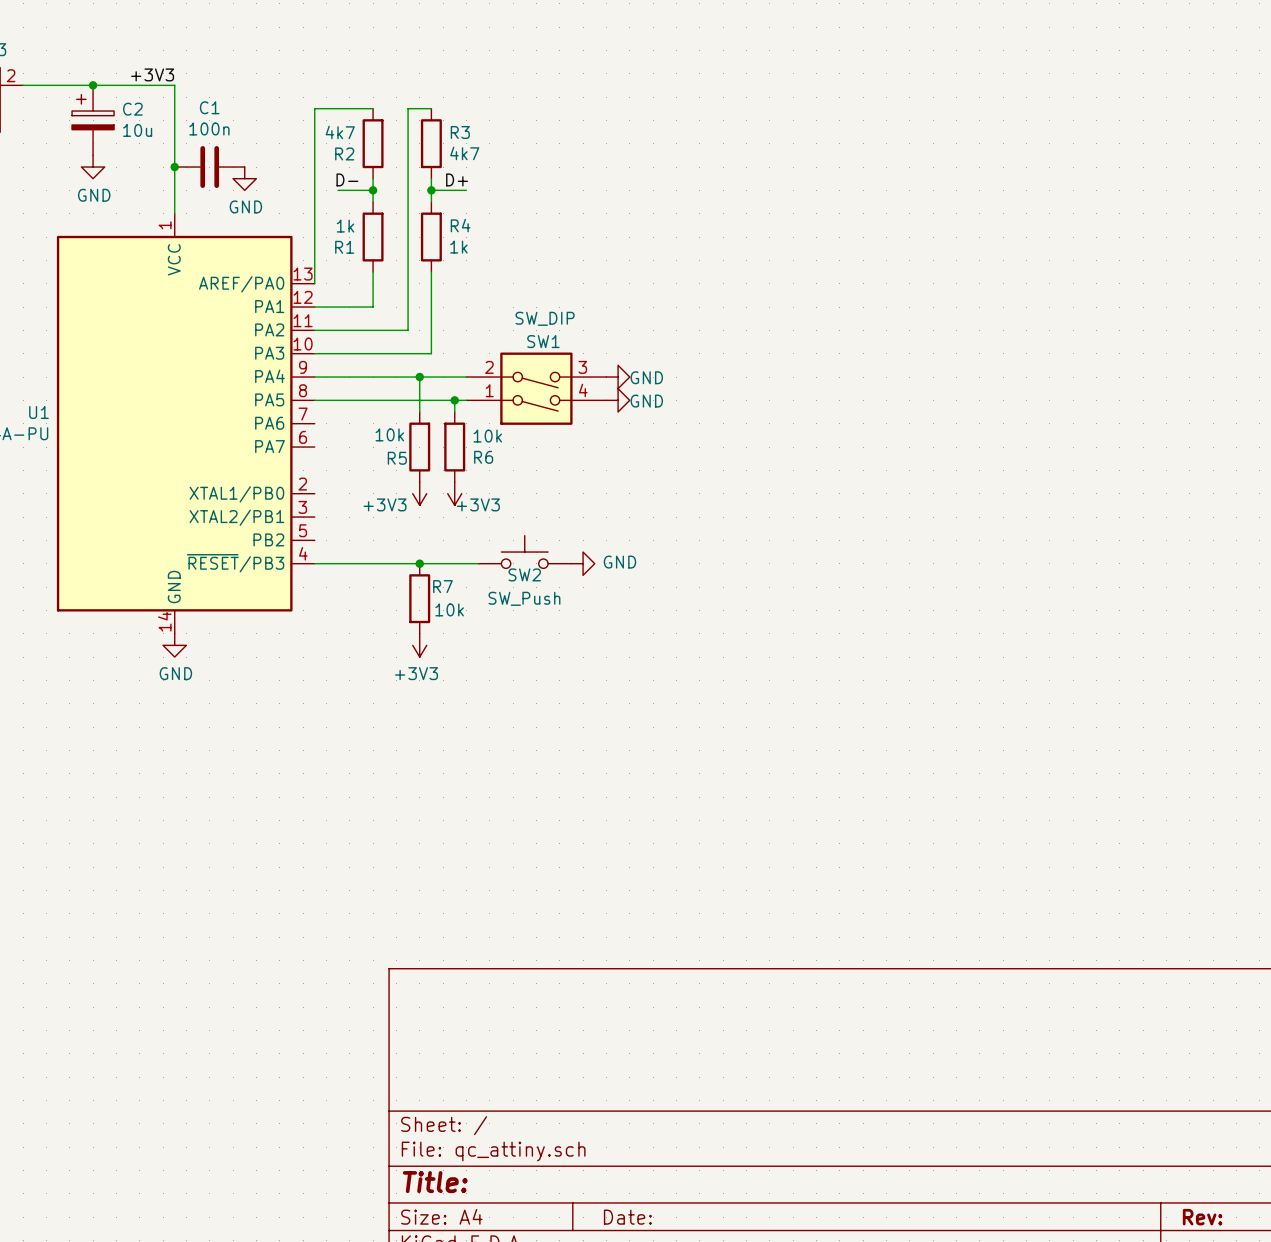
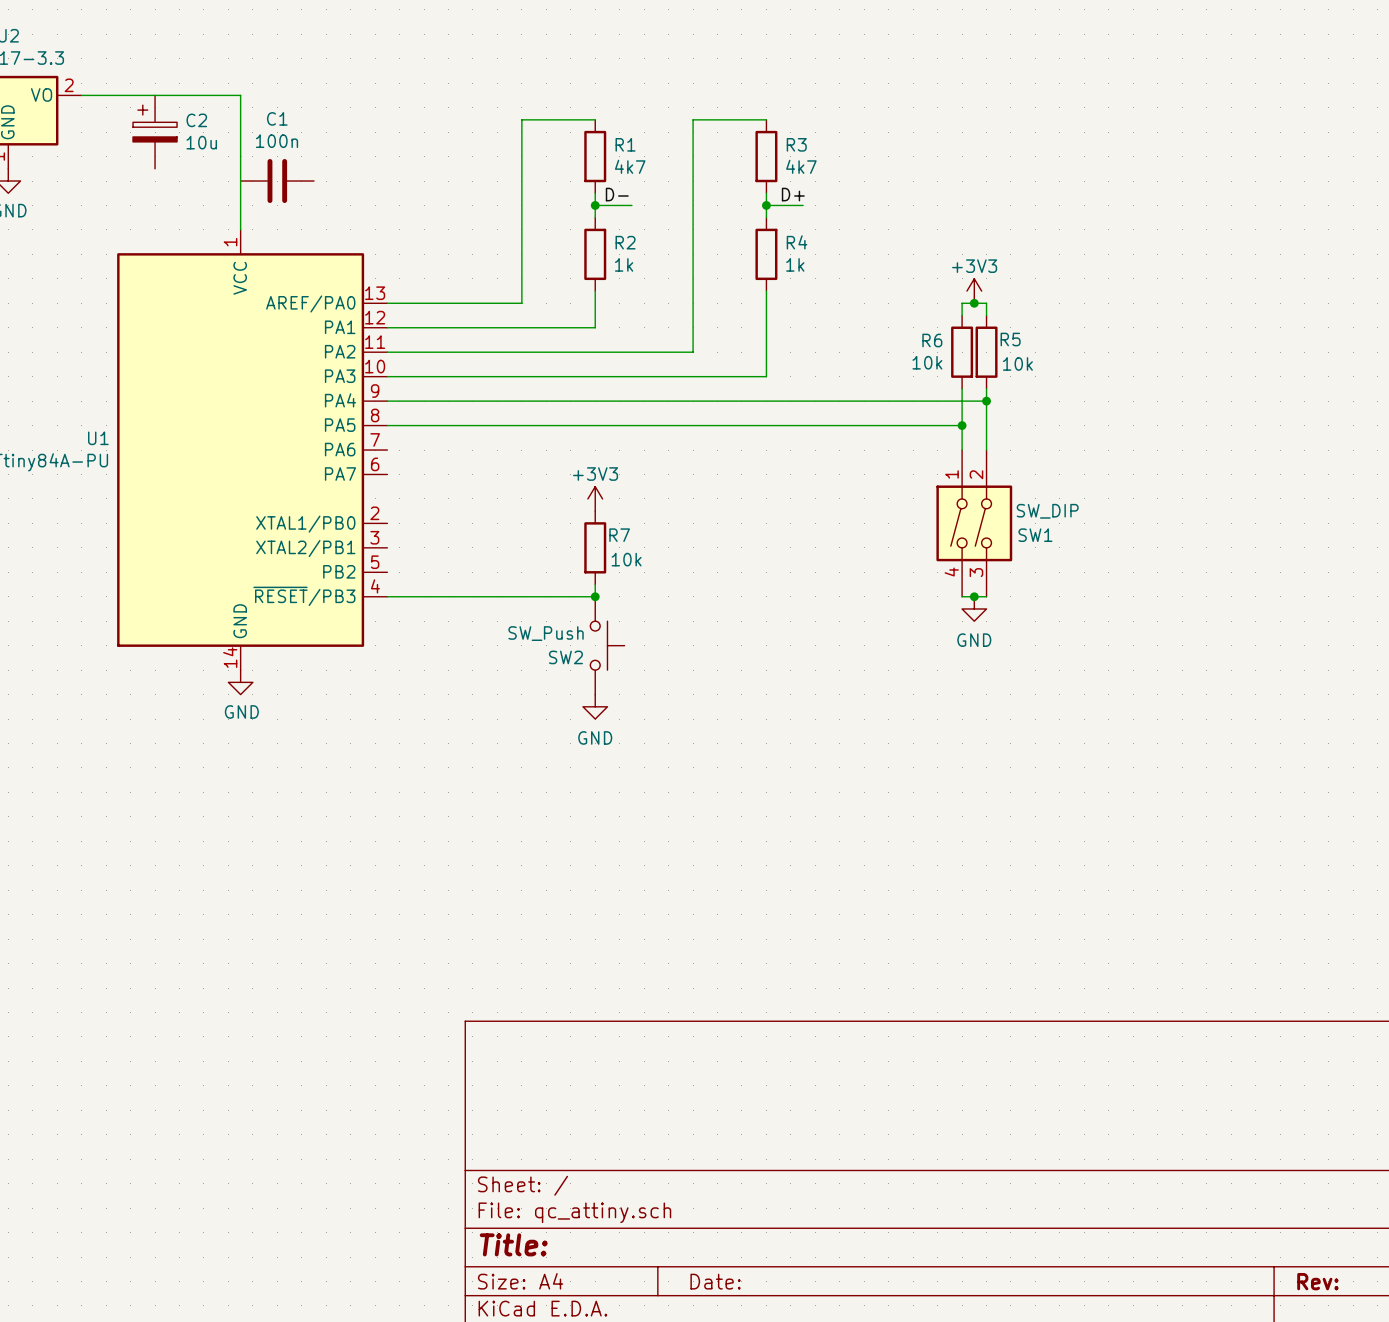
label: +3V3 (152, 74) -> none
junction: (93, 85) -> none
wire: (373, 108) (314, 108) (314, 283) -> (595, 119) (521, 119) (521, 303) (387, 303)
wire: (431, 108) (408, 108) (408, 330) -> (766, 119) (693, 119) (693, 352) (485, 352)
R2 value: 4k7 (340, 132) -> 1k (624, 264)
R2 position: (373, 143) -> (595, 254)
R3 position: (431, 143) -> (766, 156)
R2 name position: R2 (344, 153) -> R2 (625, 242)
power symbol: GND (93, 167) -> none
junction: (174, 167) -> none
power symbol: GND (244, 178) -> none
wire: (373, 178) (373, 202) -> none
wire: (431, 178) (431, 202) -> (595, 193) (595, 217)
wire: none -> (766, 193) (766, 217)
label position: D- (347, 179) -> D- (617, 194)
label: D+ (457, 179) -> none
label: none -> D+ (793, 194)
wire: (338, 190) (373, 190) -> none
junction: (373, 190) -> none
wire: (431, 190) (466, 190) -> (595, 205) (631, 205)
junction: (431, 190) -> none
junction: none -> (595, 205)
wire: none -> (766, 205) (803, 205)
junction: none -> (766, 205)
R1 value: 1k (345, 226) -> 4k7 (630, 166)
R1 position: (373, 237) -> (595, 156)
R4 position: (431, 237) -> (766, 254)
R1 name position: R1 (344, 247) -> R1 (625, 144)
wire: (373, 272) (373, 307) -> (595, 291) (595, 327) (448, 327)
wire: (431, 272) (431, 353) -> (766, 291) (766, 376) (509, 376)
power symbol: none -> +3V3 (974, 291)
junction: none -> (974, 303)
wire: none -> (962, 315) (962, 303) (986, 303) (986, 315)
SW1 value position: SW_DIP (545, 318) -> SW_DIP (1047, 511)
wire: none -> (962, 388) (962, 450)
wire: none -> (986, 388) (986, 450)
wire: (419, 377) (419, 412) -> none
junction: (419, 377) -> none
wire: none -> (546, 401) (986, 401)
power symbol: GND (618, 377) -> none
junction: none -> (986, 401)
SW1 rotation: 0° (536, 388) -> 90° clockwise (974, 523)
SW1 position: (536, 388) -> (974, 523)
wire: (454, 400) (454, 412) -> none
junction: (454, 400) -> none
wire: none -> (546, 425) (962, 425)
power symbol: GND (618, 400) -> none
junction: none -> (962, 425)
R5 value position: 10k (389, 434) -> 10k (1017, 363)
R6 value position: 10k (487, 436) -> 10k (927, 362)
R5 position: (419, 447) -> (986, 352)
R6 position: (454, 447) -> (962, 352)
R6 name position: R6 (483, 457) -> R6 (932, 340)
R5 name position: R5 (397, 458) -> R5 (1010, 339)
power symbol: none -> +3V3 (595, 498)
power symbol: +3V3 (419, 493) -> none
power symbol: +3V3 (454, 493) -> none
SW2 rotation: 0° (524, 552) -> 90° clockwise (607, 645)
SW2 position: (524, 552) -> (607, 645)
junction: (419, 563) -> none
junction: none -> (595, 596)
power symbol rotation: 0° (583, 563) -> 90° clockwise (595, 706)
power symbol position: GND (583, 563) -> GND (595, 706)
wire: none -> (962, 596) (986, 596)
junction: none -> (974, 596)
power symbol: none -> GND (974, 608)
R7 position: (419, 598) -> (595, 547)
power symbol: +3V3 (419, 645) -> none

